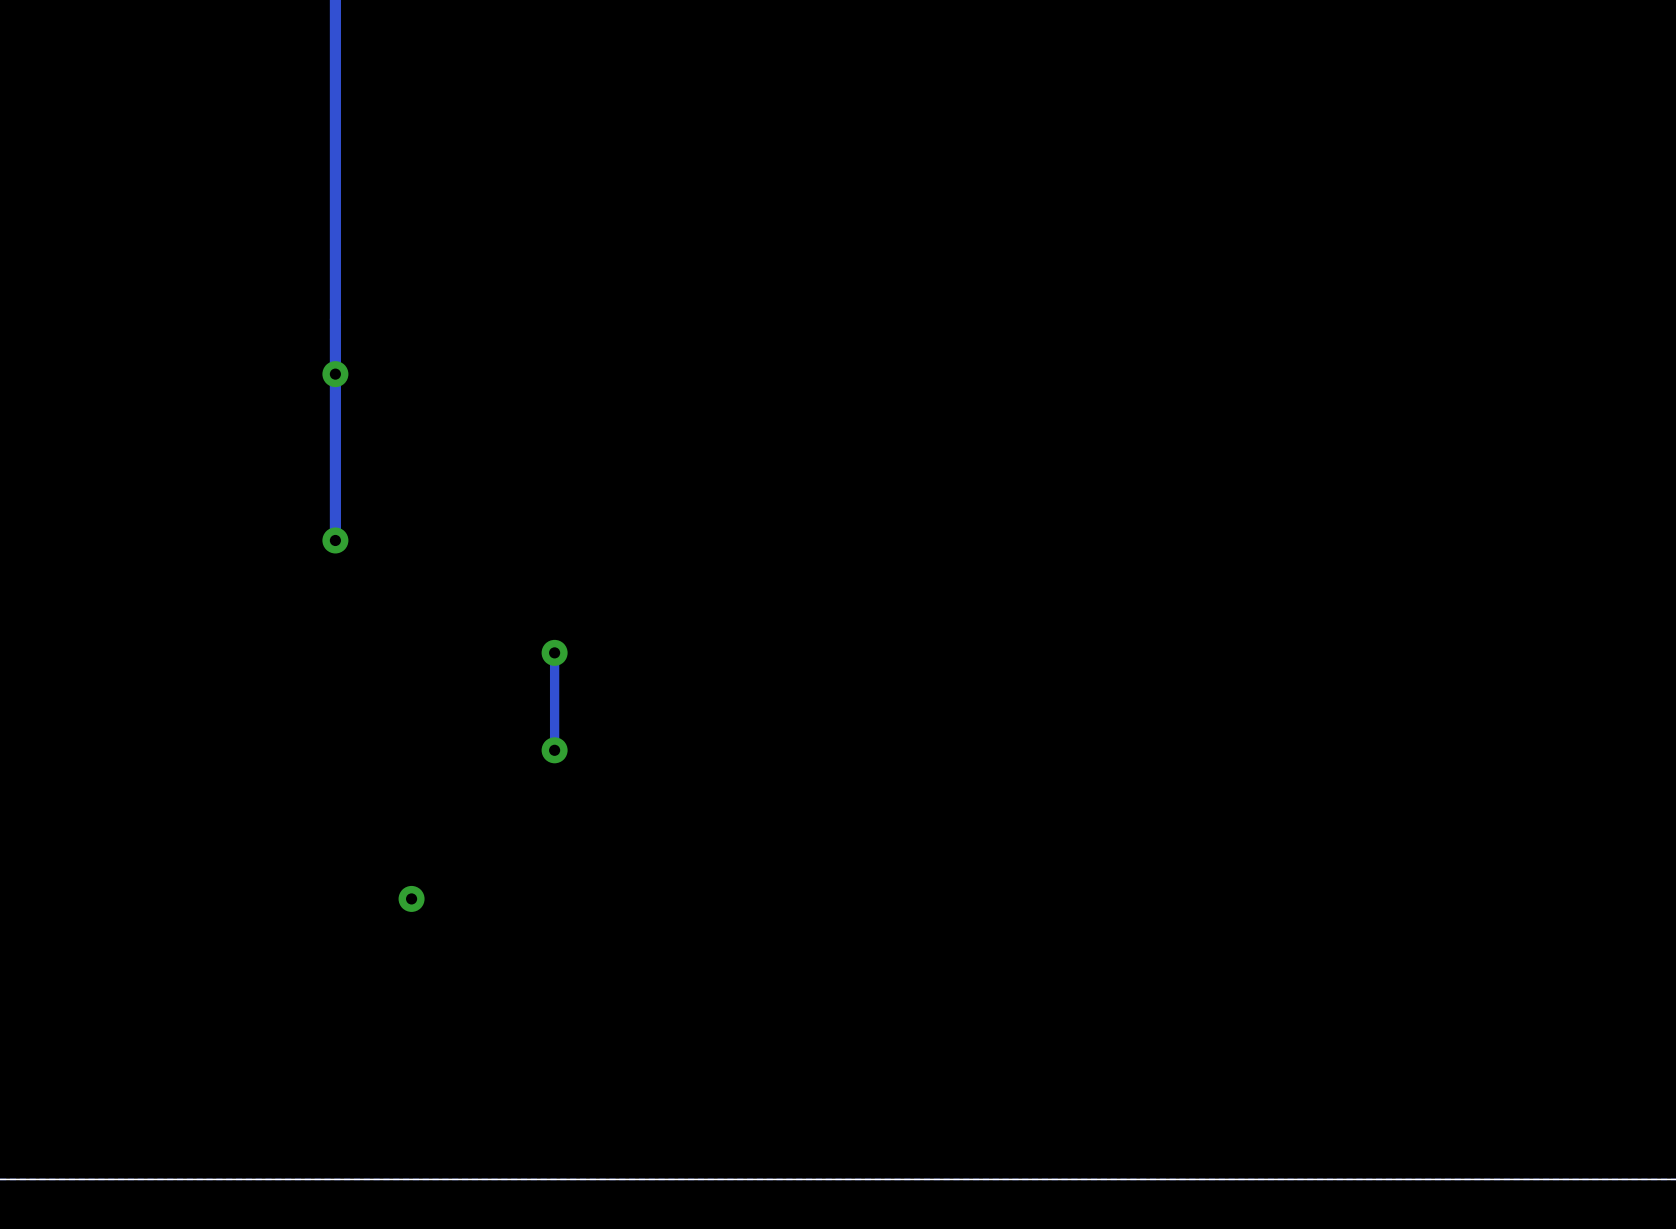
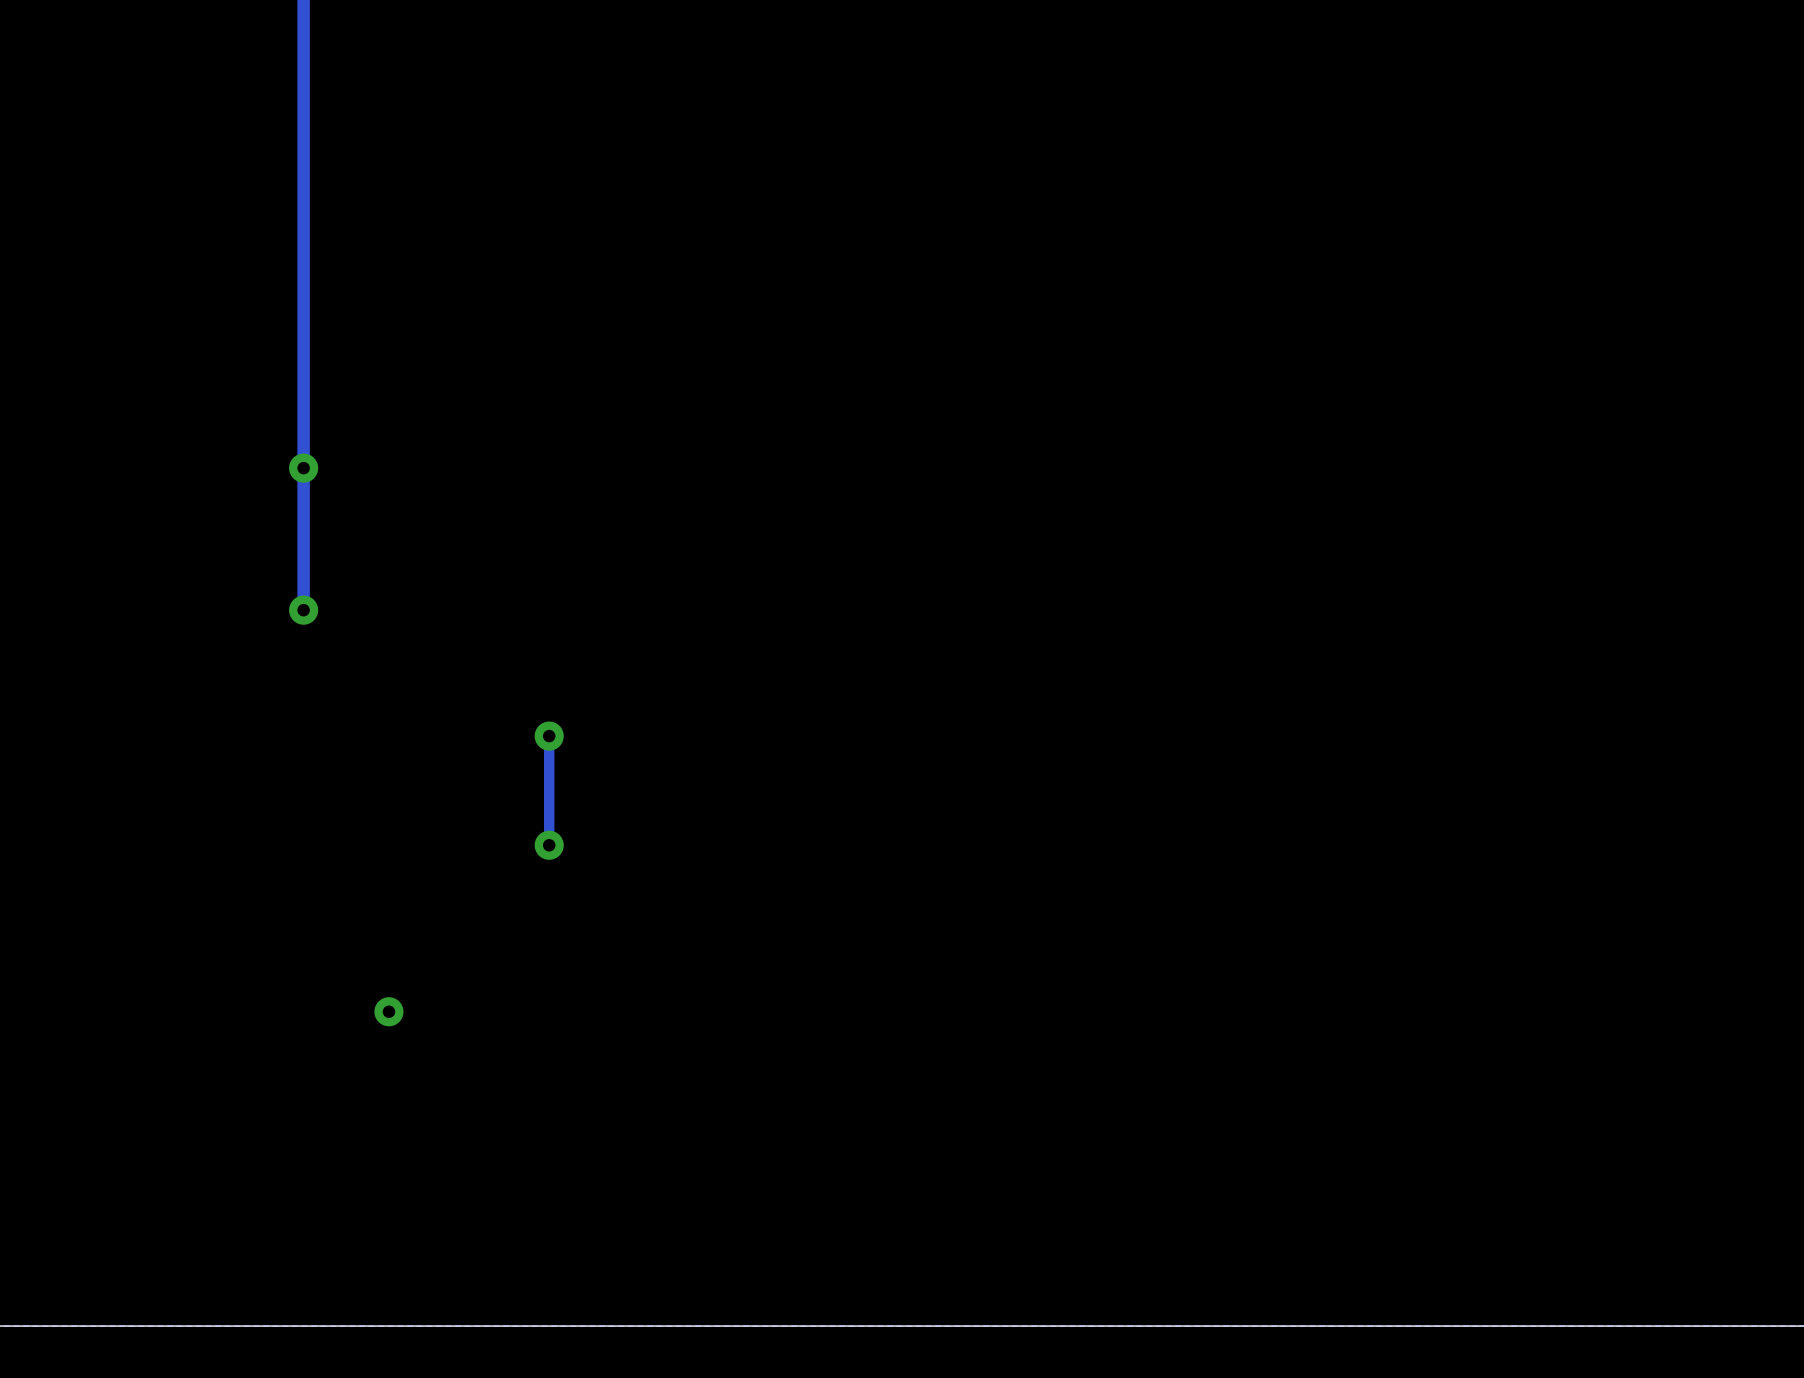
via position: (335, 374) -> (303, 468)

